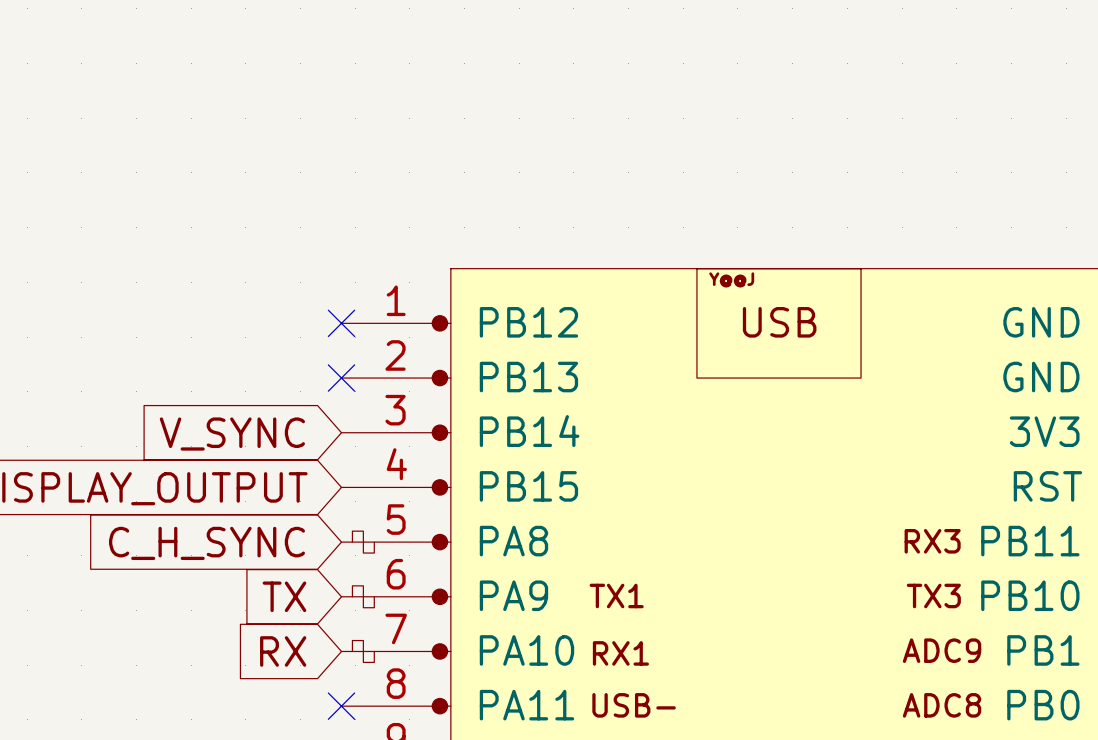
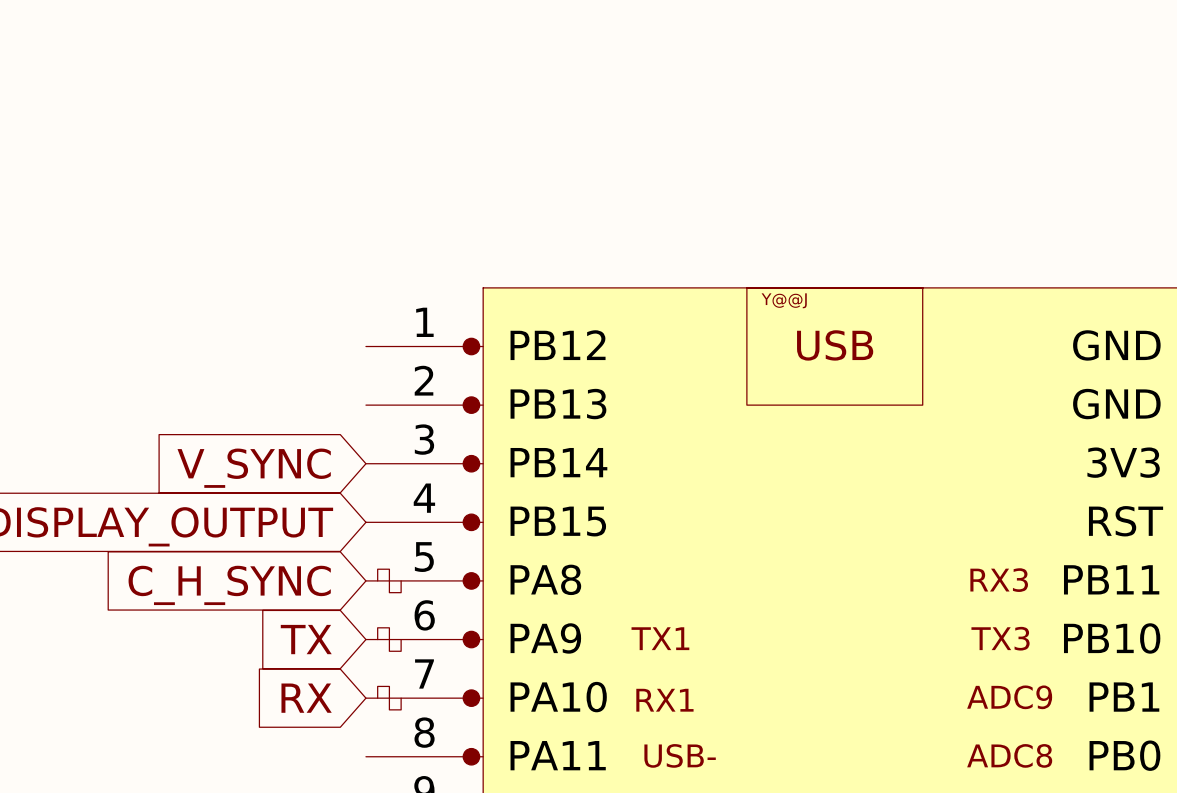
no-connect mark: (341, 323) -> none
no-connect mark: (341, 378) -> none
no-connect mark: (341, 706) -> none

